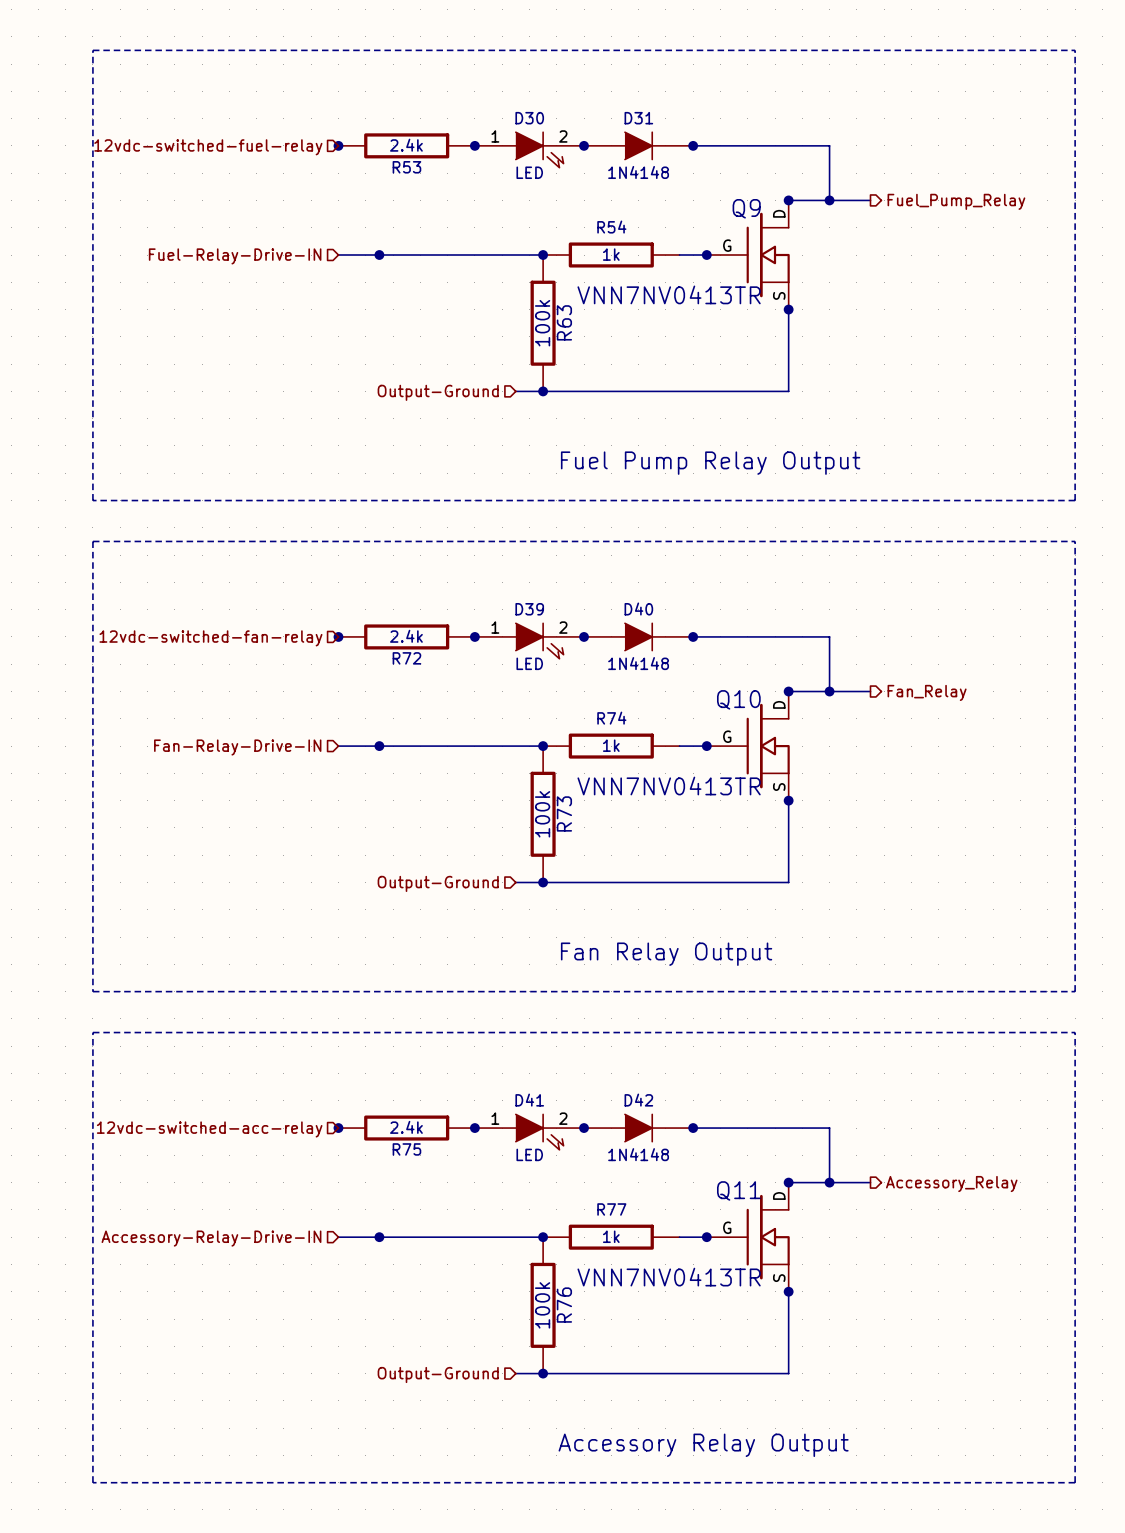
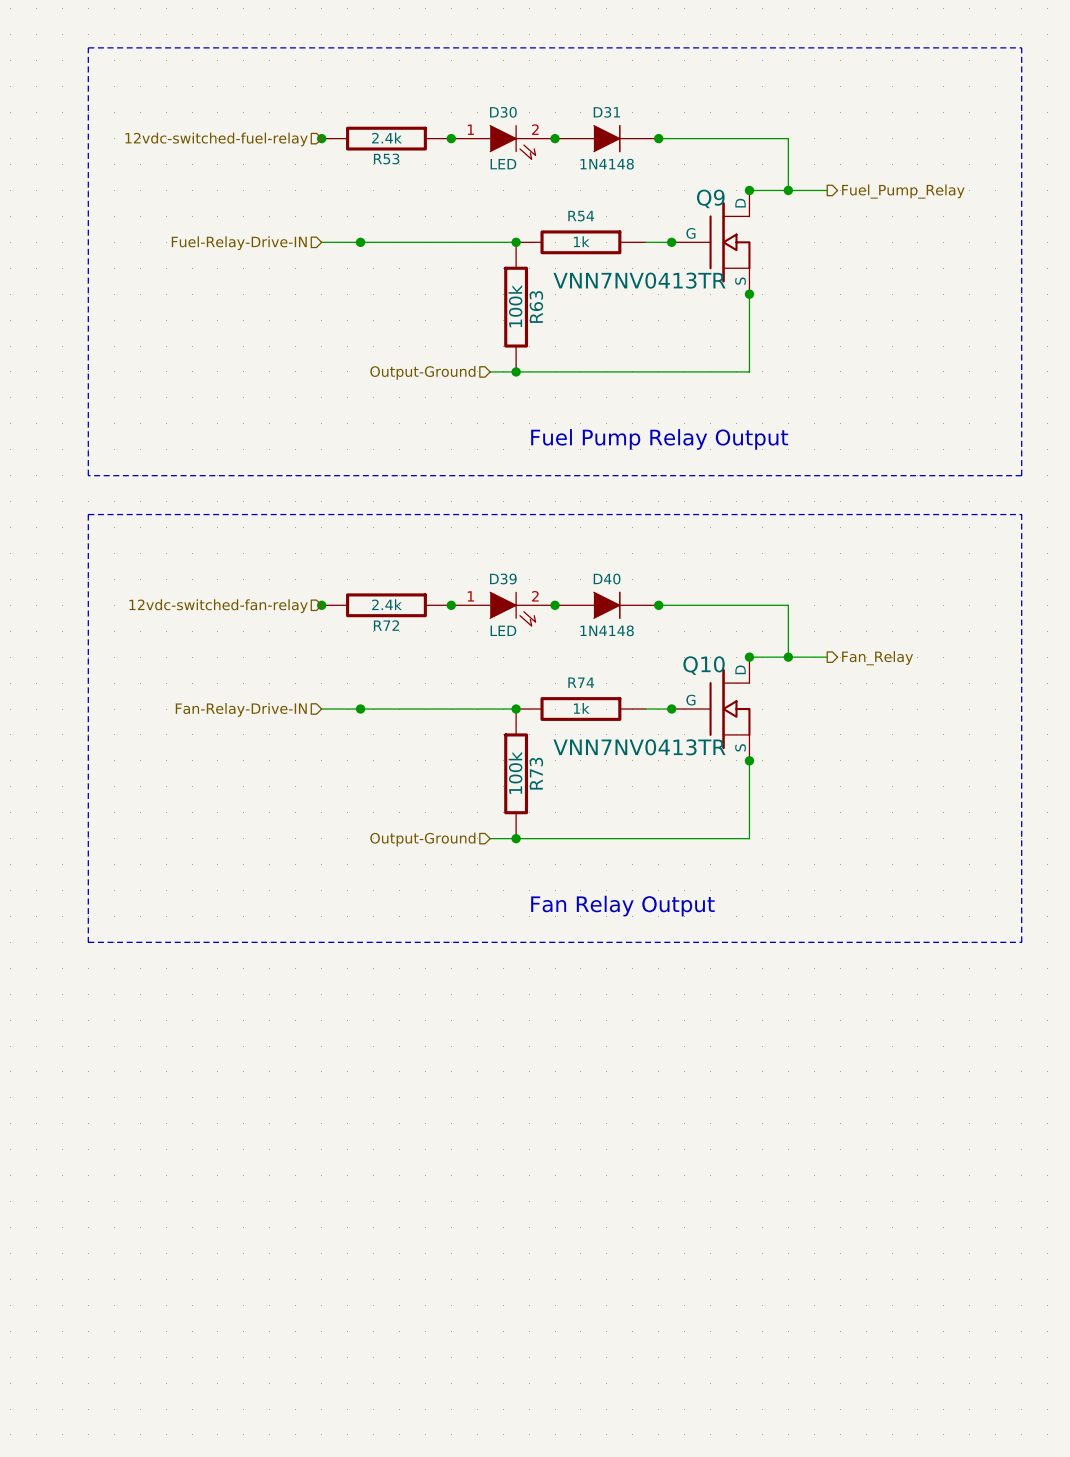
line: (92, 1032) (92, 1482) (1075, 1482) (1075, 1032) (92, 1032) -> none
junction: (338, 1128) -> none
R75: 2.4k (406, 1128) -> none
junction: (474, 1128) -> none
junction: (584, 1128) -> none
D42: 1N4148 (638, 1128) -> none
wire: (693, 1128) (829, 1128) (829, 1182) -> none
junction: (693, 1128) -> none
hierarchical label: 12vdc-switched-acc-relay (209, 1129) -> none
D41: LED (529, 1132) -> none
wire: (788, 1182) (870, 1182) -> none
junction: (788, 1182) -> none
junction: (829, 1182) -> none
hierarchical label: Accessory_Relay (951, 1184) -> none
wire: (338, 1237) (543, 1237) -> none
junction: (379, 1237) -> none
junction: (543, 1237) -> none
R77: 1k (611, 1237) -> none
wire: (679, 1237) (706, 1237) -> none
junction: (706, 1237) -> none
Q11: VNN7NV0413TR (748, 1237) -> none
hierarchical label: Accessory-Relay-Drive-IN (211, 1238) -> none
wire: (788, 1291) (788, 1373) (515, 1373) -> none
junction: (788, 1291) -> none
R76: 100k (543, 1305) -> none
junction: (543, 1373) -> none
hierarchical label: Output-Ground (438, 1374) -> none
text: Accessory Relay Output (703, 1445) -> none

